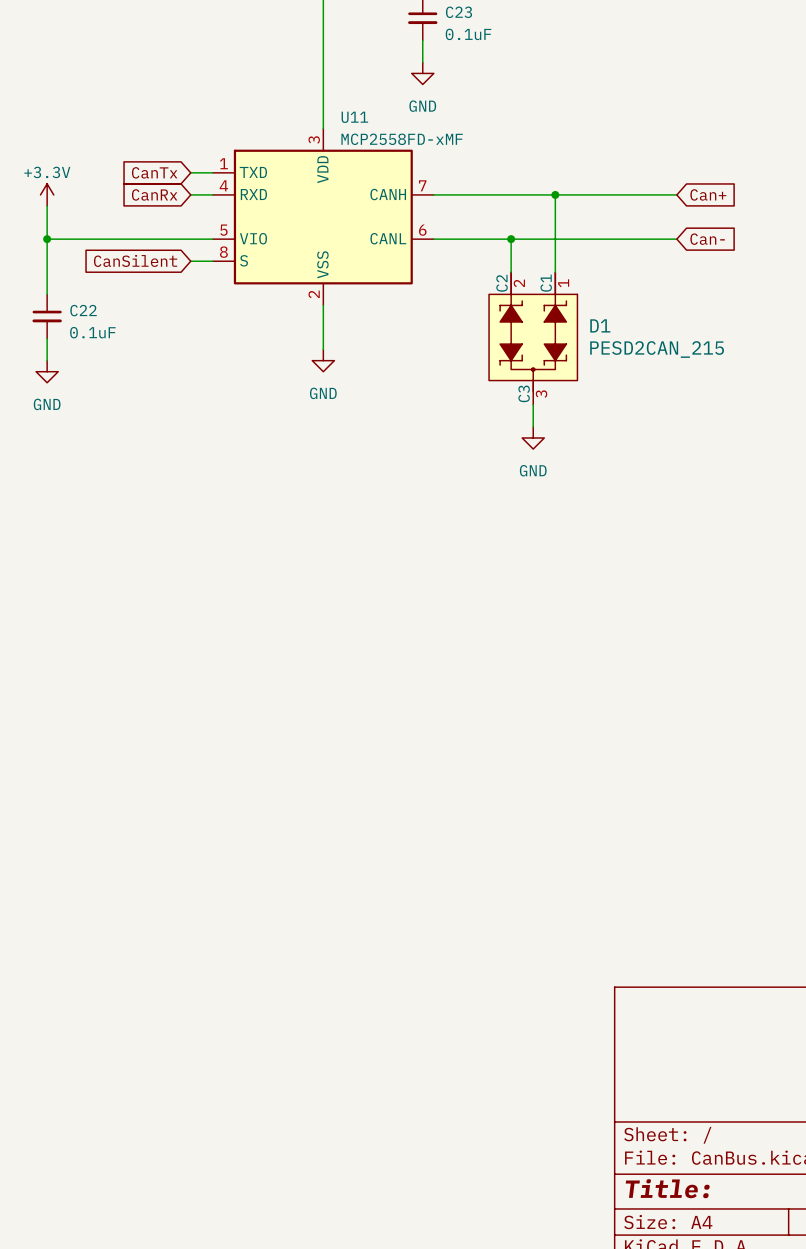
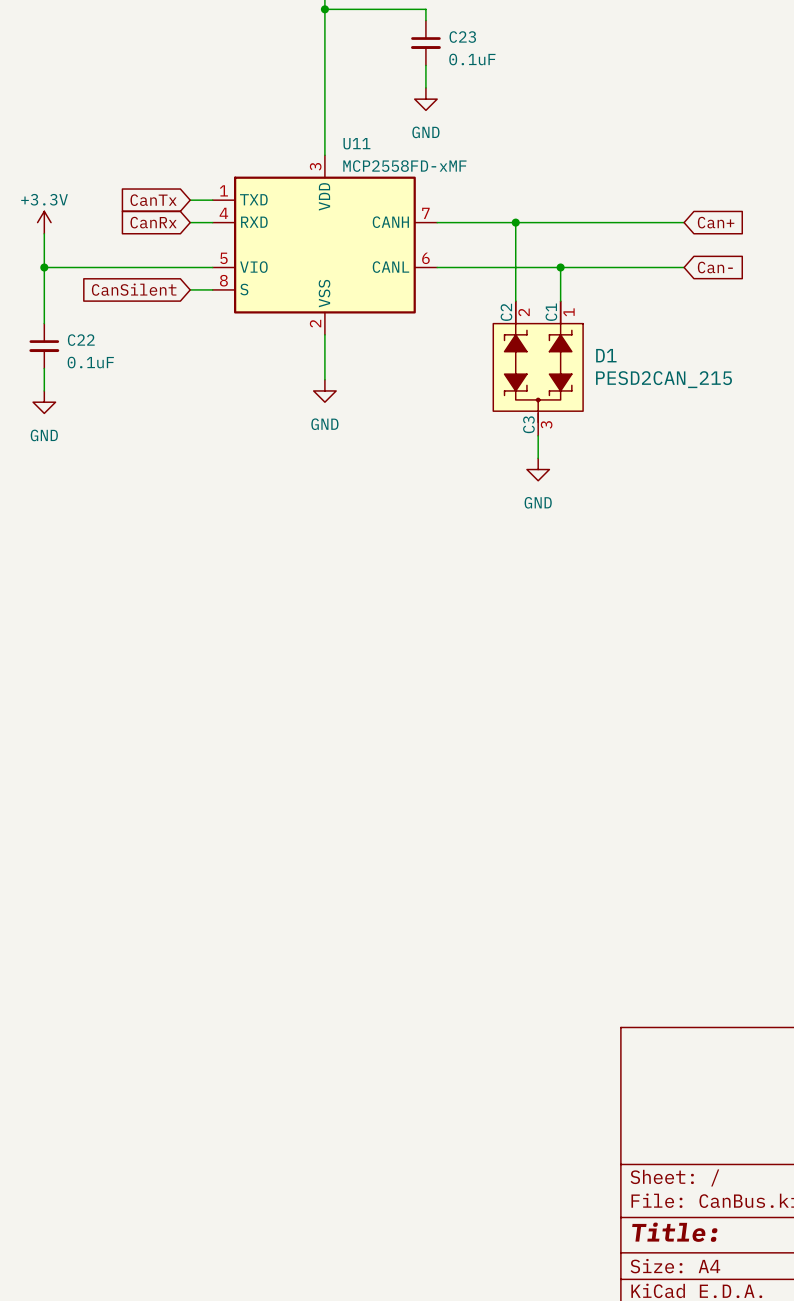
junction: none -> (515, 222)
wire: (555, 194) (555, 239) -> (515, 222) (515, 267)
junction: (555, 194) -> none
junction: (511, 239) -> none
junction: none -> (560, 267)

